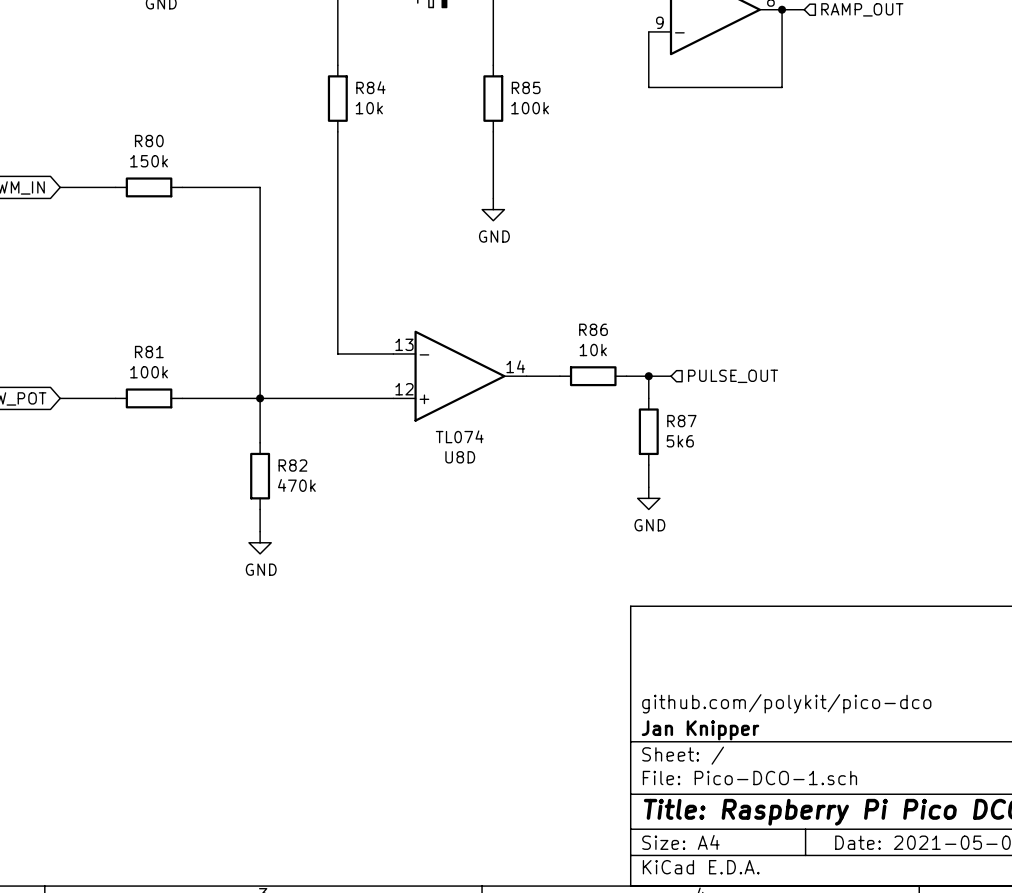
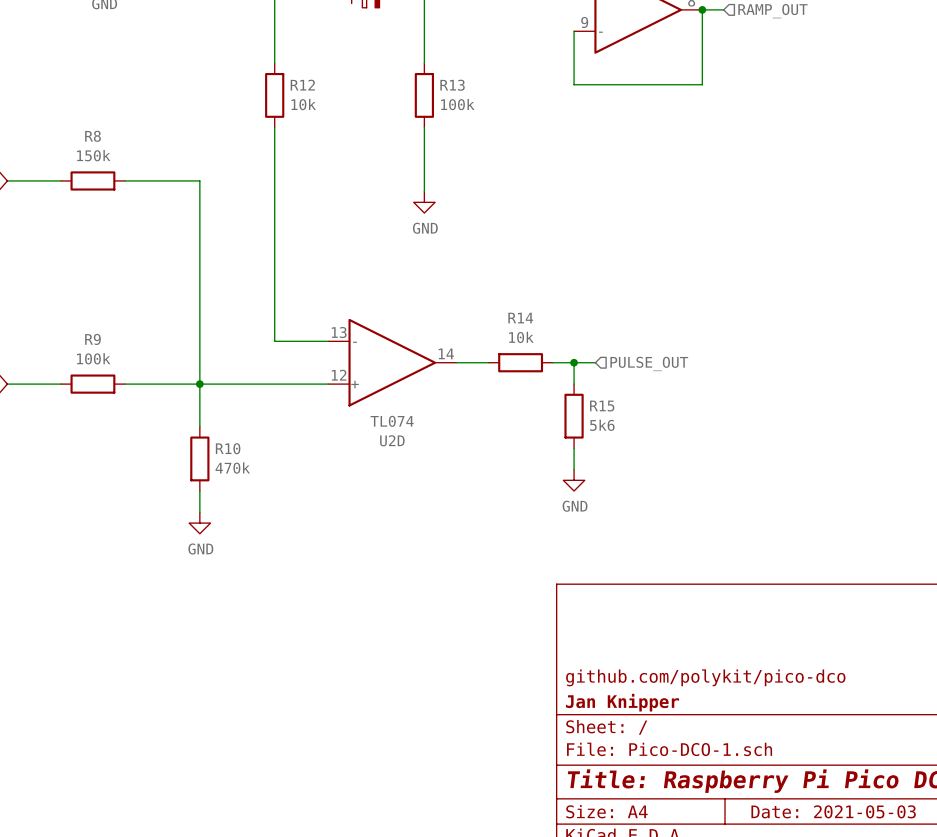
R84 name: R84 (370, 87) -> R12 (302, 85)
R85 name: R85 (526, 87) -> R13 (452, 85)
R80 name: R80 (149, 141) -> R8 (92, 136)
R86 name: R86 (593, 329) -> R14 (520, 318)
R81 name: R81 (149, 352) -> R9 (92, 339)
R87 name: R87 (681, 421) -> R15 (602, 406)
U8D name: U8D (460, 457) -> U2D (392, 440)
R82 name: R82 (292, 465) -> R10 (228, 448)

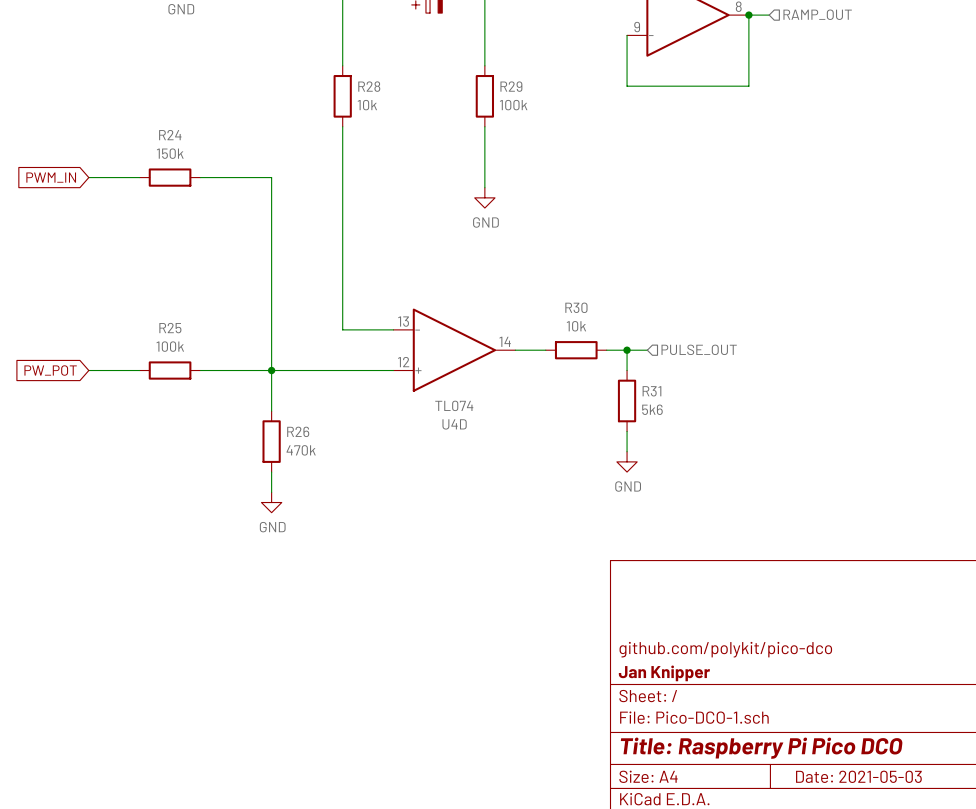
R12 name: R12 (302, 85) -> R28 (369, 86)
R13 name: R13 (452, 85) -> R29 (511, 86)
R8 name: R8 (92, 136) -> R24 (170, 135)
R14 name: R14 (520, 318) -> R30 (576, 307)
R9 name: R9 (92, 339) -> R25 (170, 328)
R15 name: R15 (602, 406) -> R31 (651, 391)
U2D name: U2D (392, 440) -> U4D (454, 424)
R10 name: R10 (228, 448) -> R26 (298, 431)

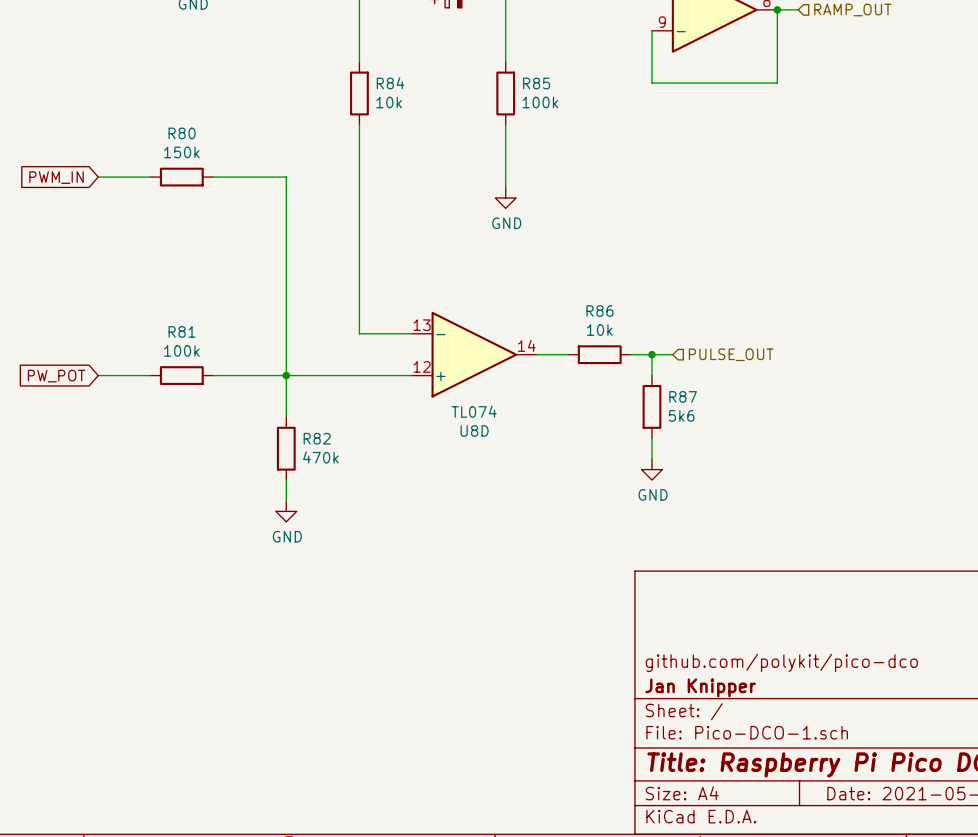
R28 name: R28 (369, 86) -> R84 (390, 83)
R29 name: R29 (511, 86) -> R85 (536, 83)
R24 name: R24 (170, 135) -> R80 (182, 133)
R30 name: R30 (576, 307) -> R86 (599, 311)
R25 name: R25 (170, 328) -> R81 (182, 331)
R31 name: R31 (651, 391) -> R87 (683, 396)
U4D name: U4D (454, 424) -> U8D (474, 430)
R26 name: R26 (298, 431) -> R82 (317, 438)

